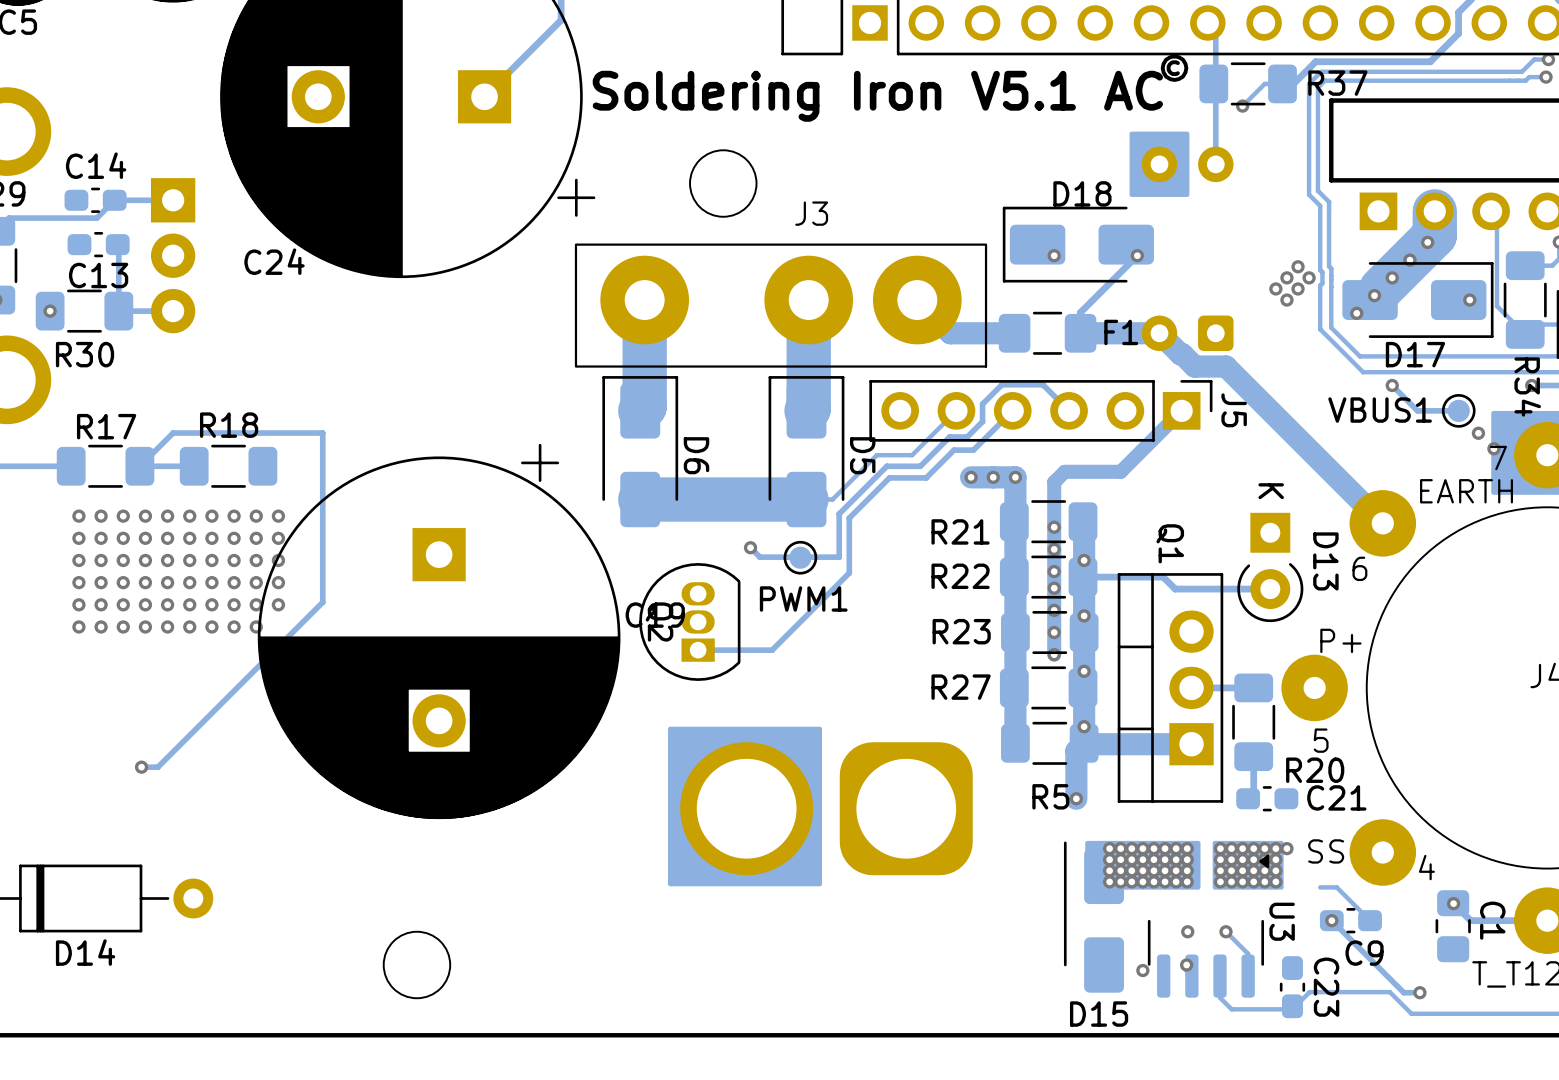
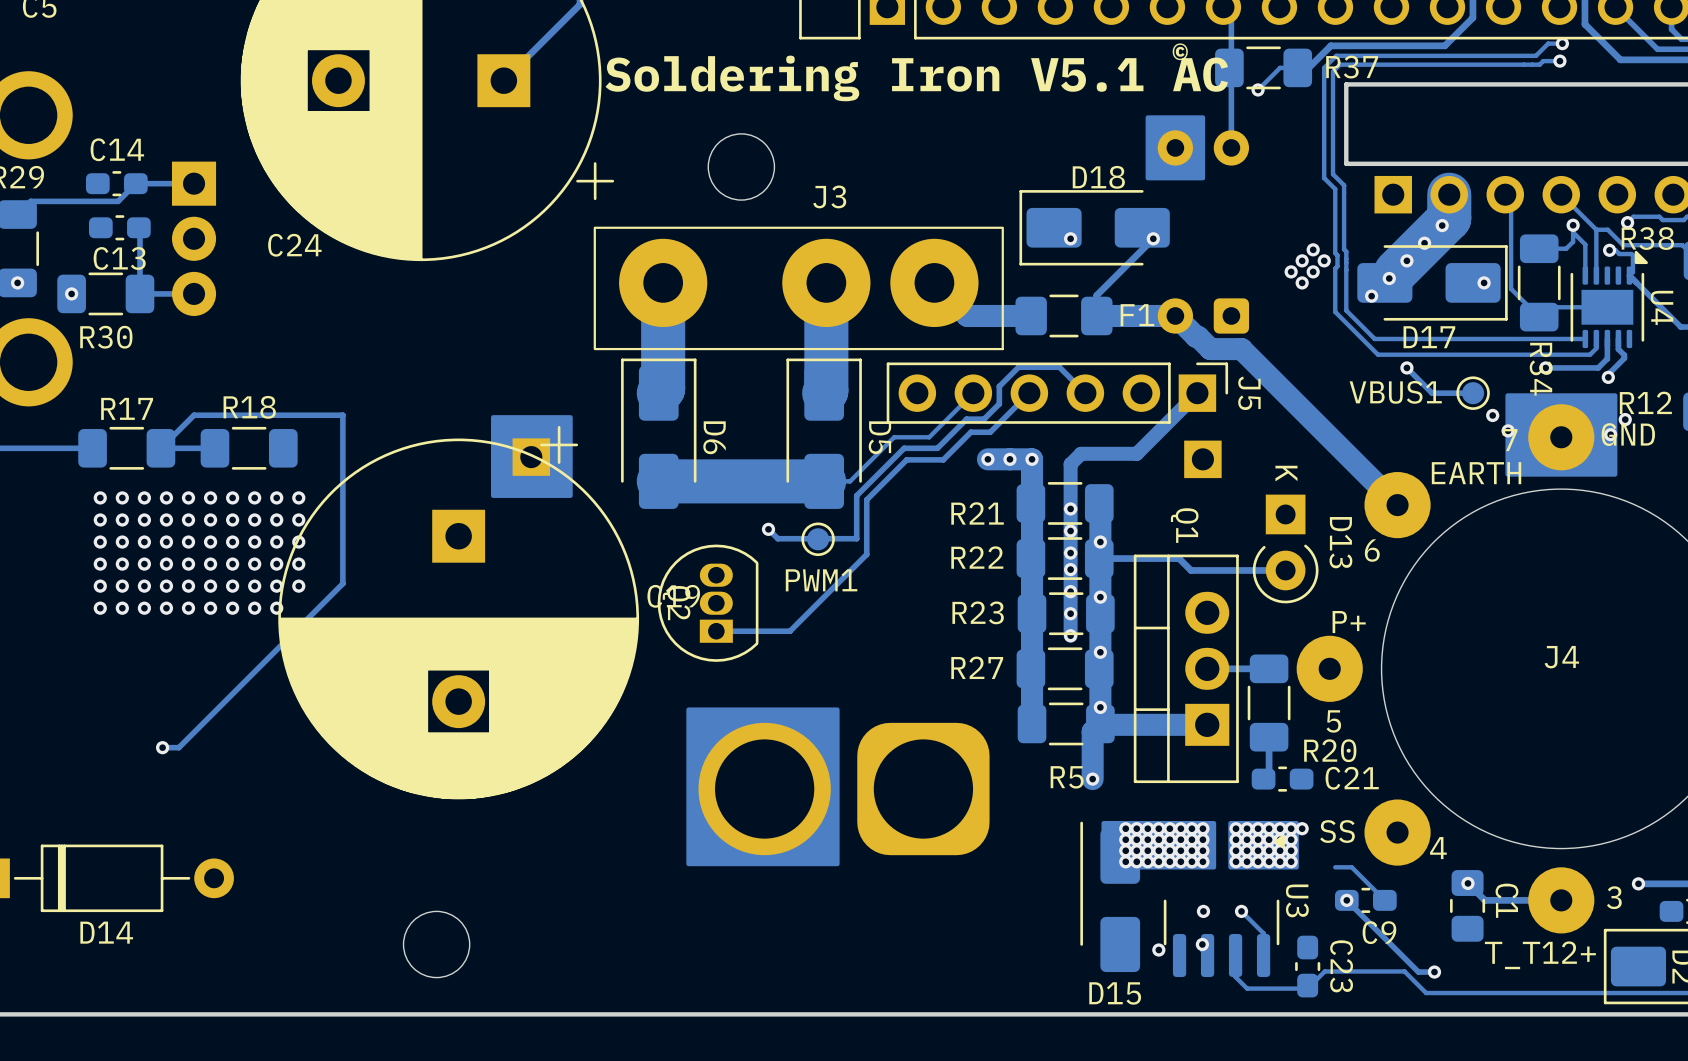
drawing: none -> [491, 415, 573, 498]
part: none -> (531, 457)
part: none -> (1202, 459)

